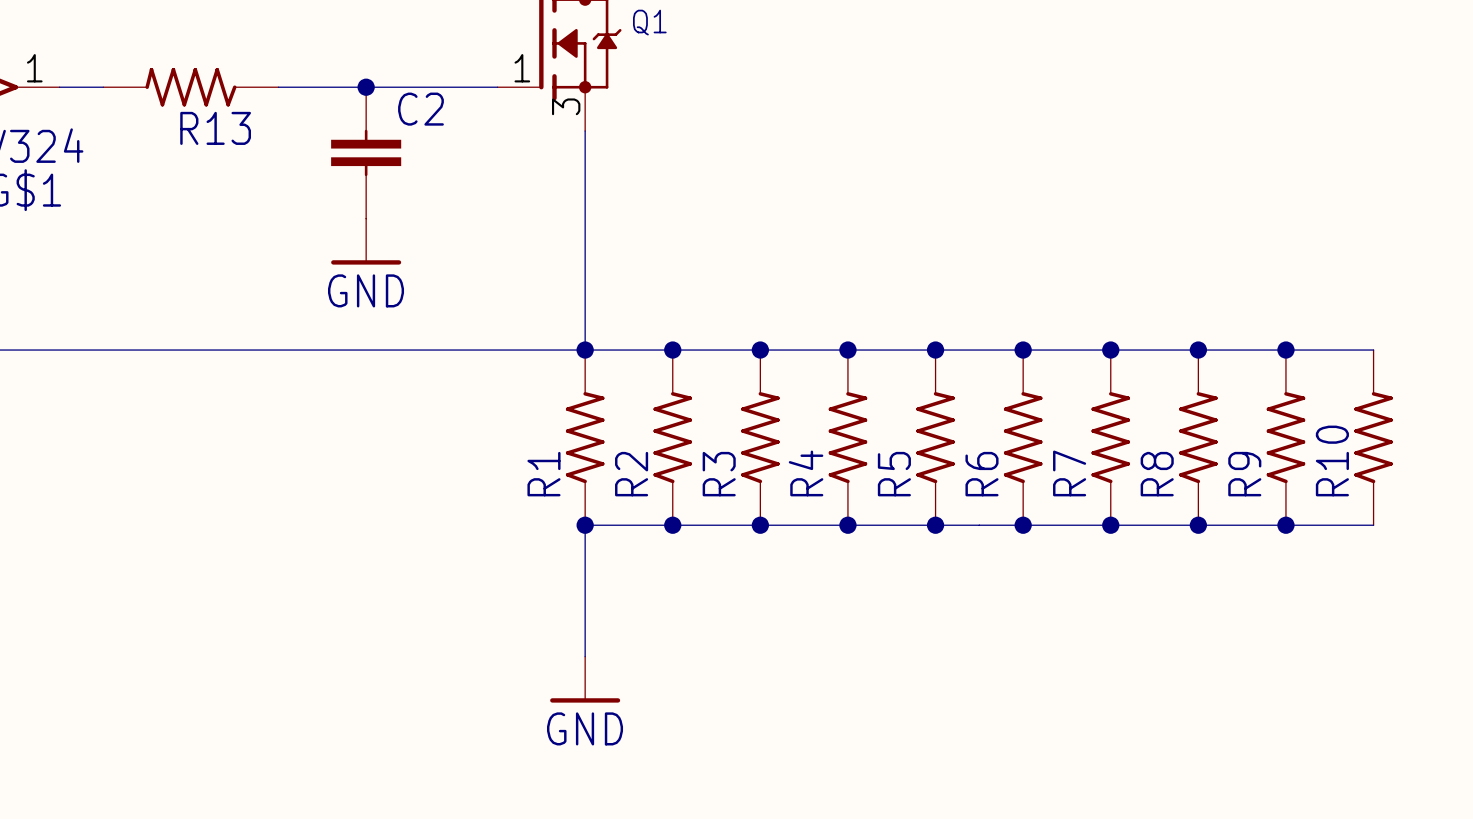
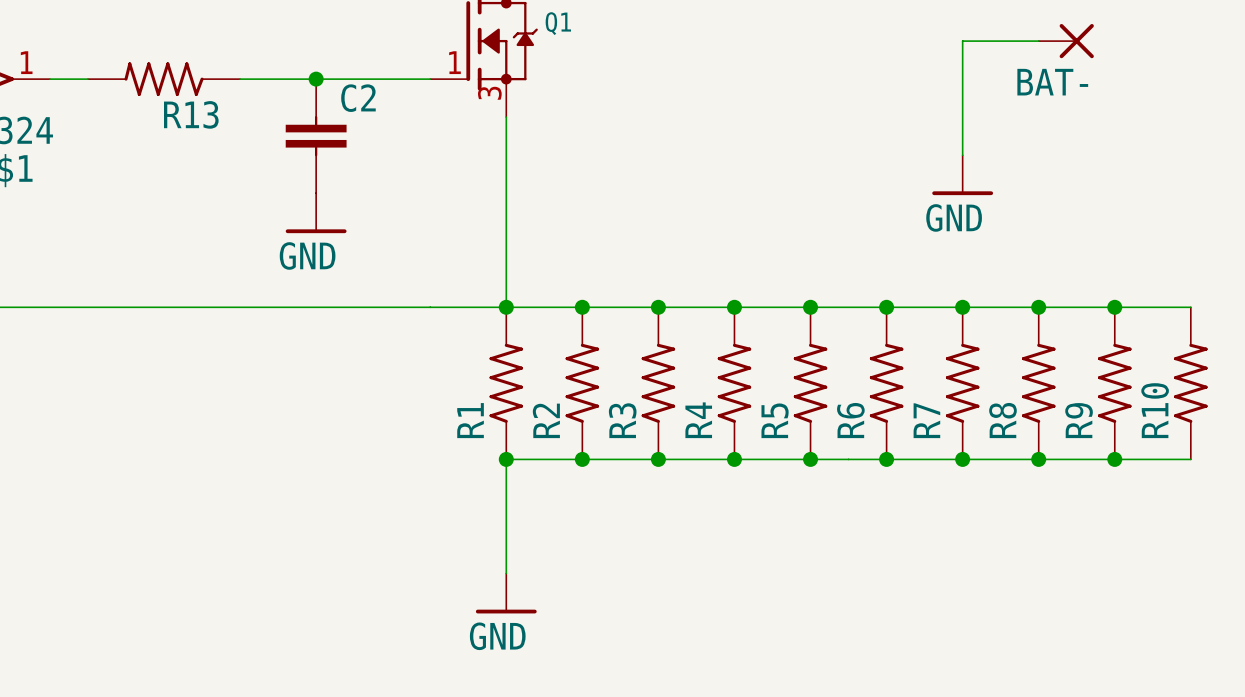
wire: none -> (1038, 41) (962, 41) (962, 155)
BAT-: none -> (1066, 41)
power symbol: none -> GND (962, 175)

